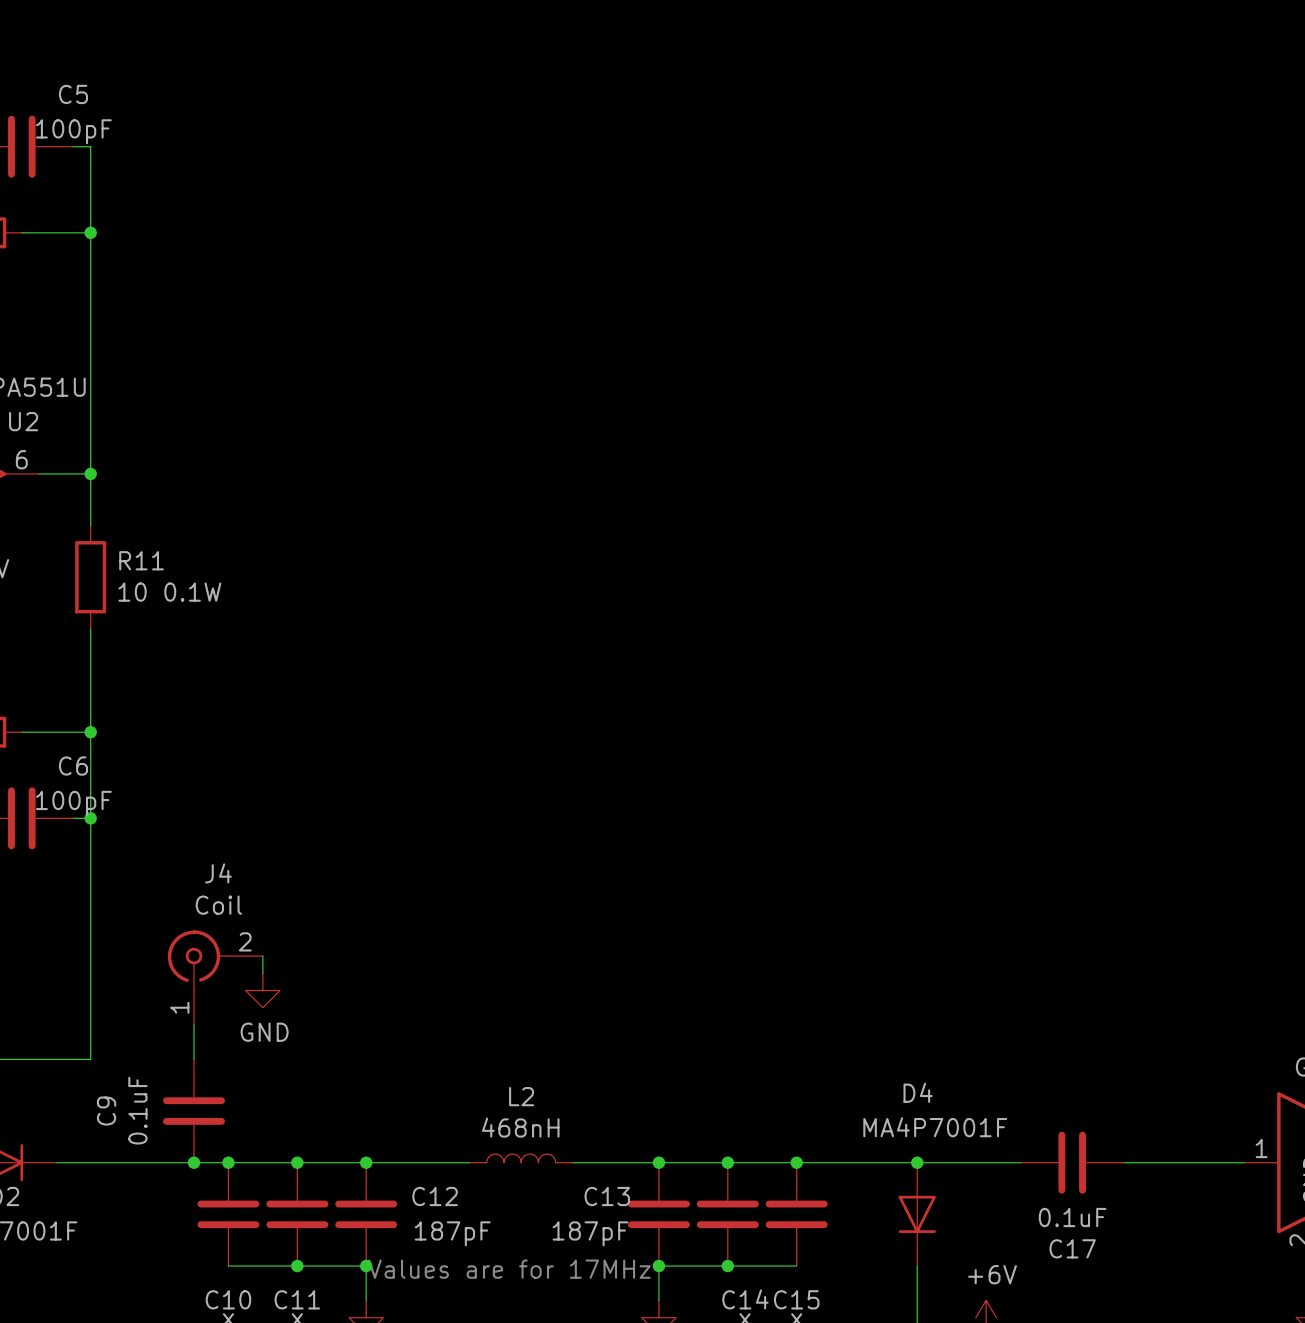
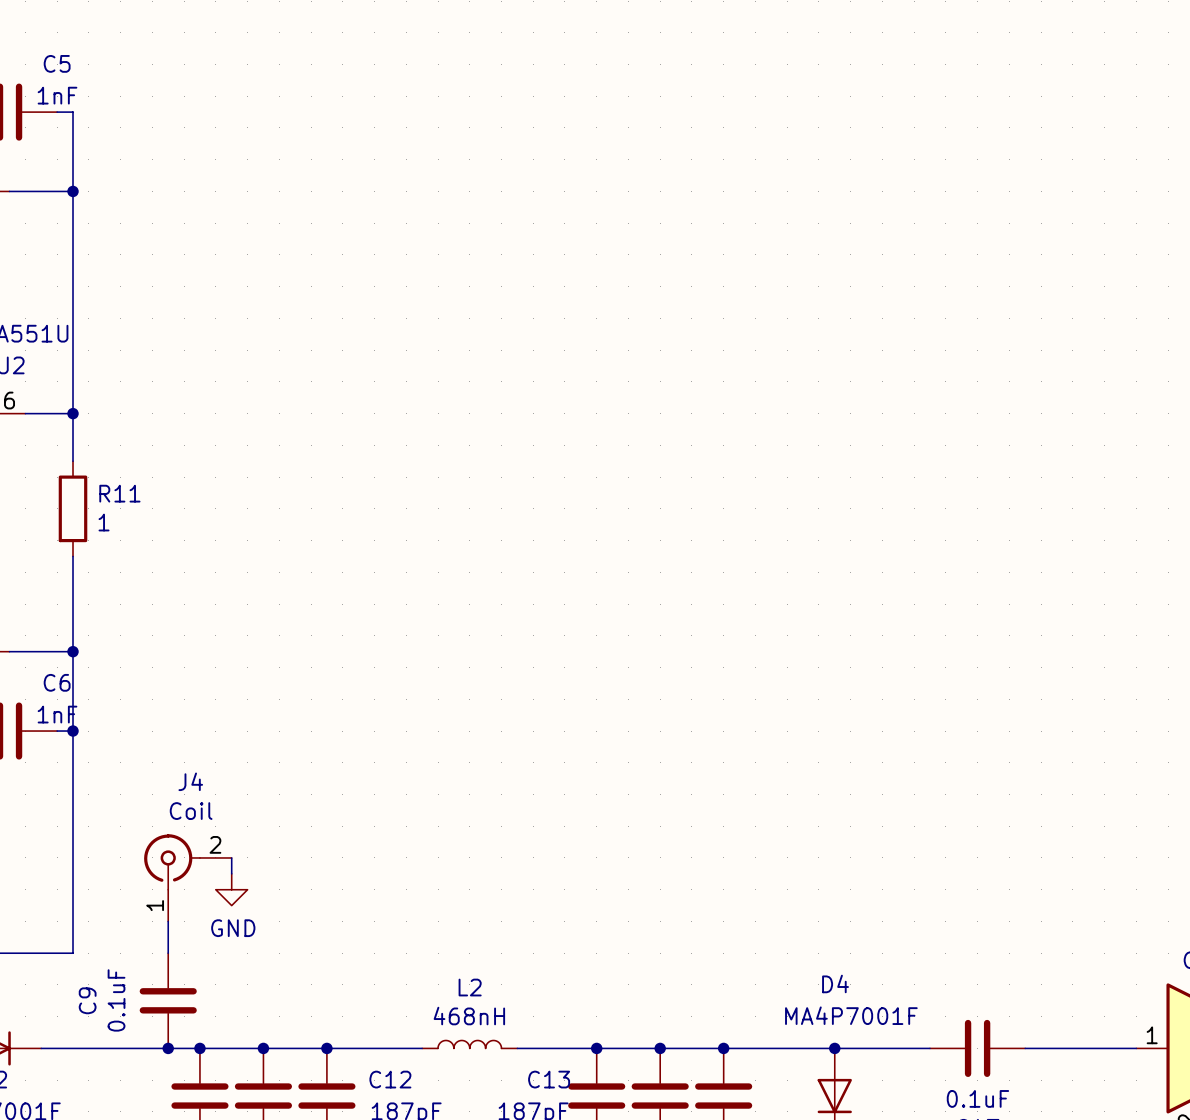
C5 value: 100pF (73, 131) -> 1nF (57, 95)
R11 value: 10 0.1W (169, 592) -> 1 (104, 522)
C6 value: 100pF (73, 803) -> 1nF (57, 714)

